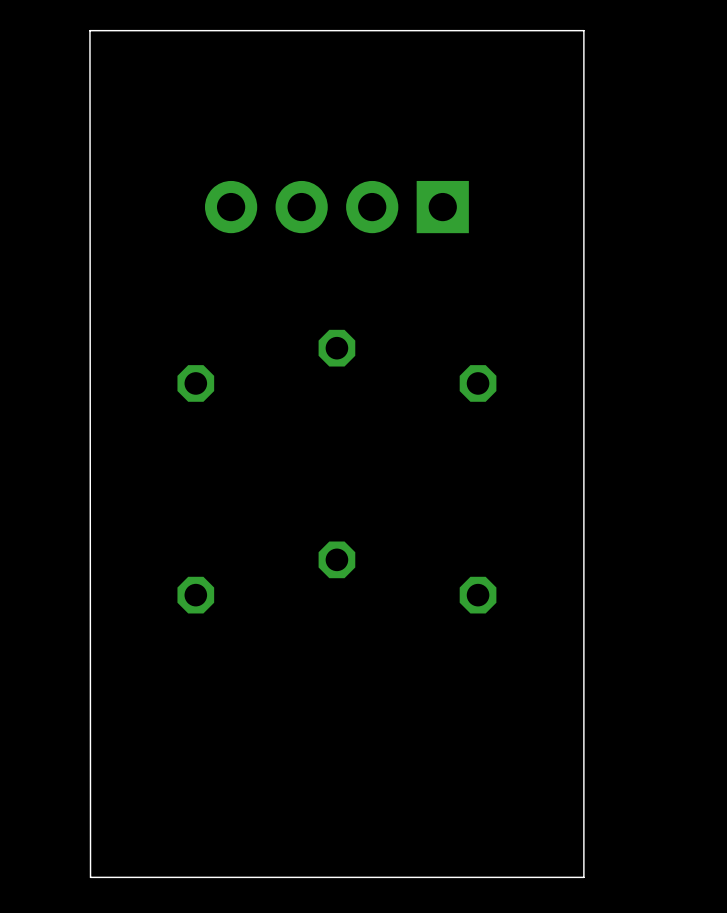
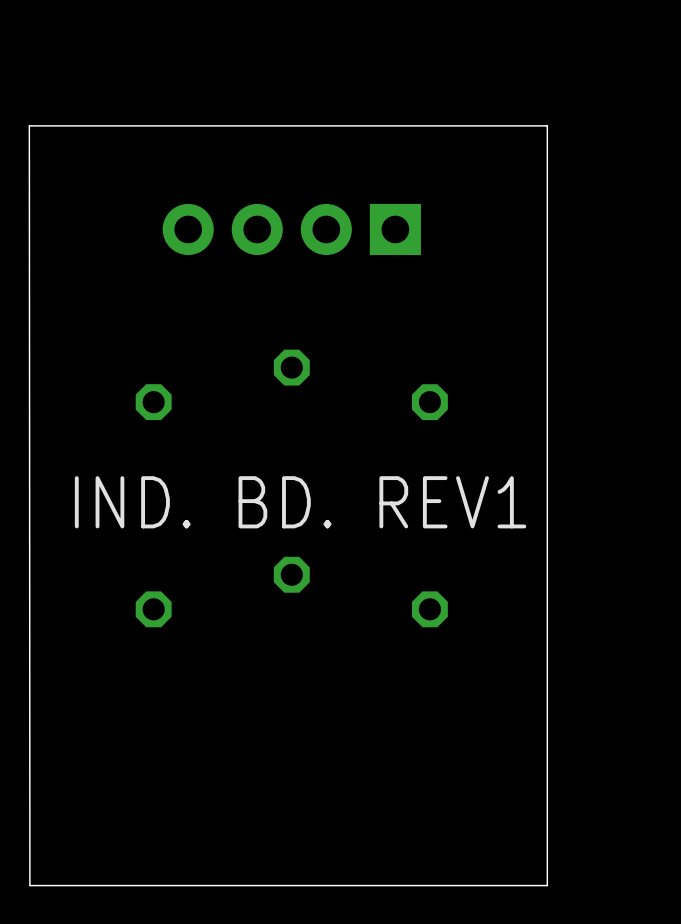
text: none -> IND. BD. REV1 (300, 502)
board edge: (583, 877) (583, 30) (89, 30) (90, 877) -> (533, 885) (547, 885) (547, 125) (29, 125) (29, 885) (50, 885)

